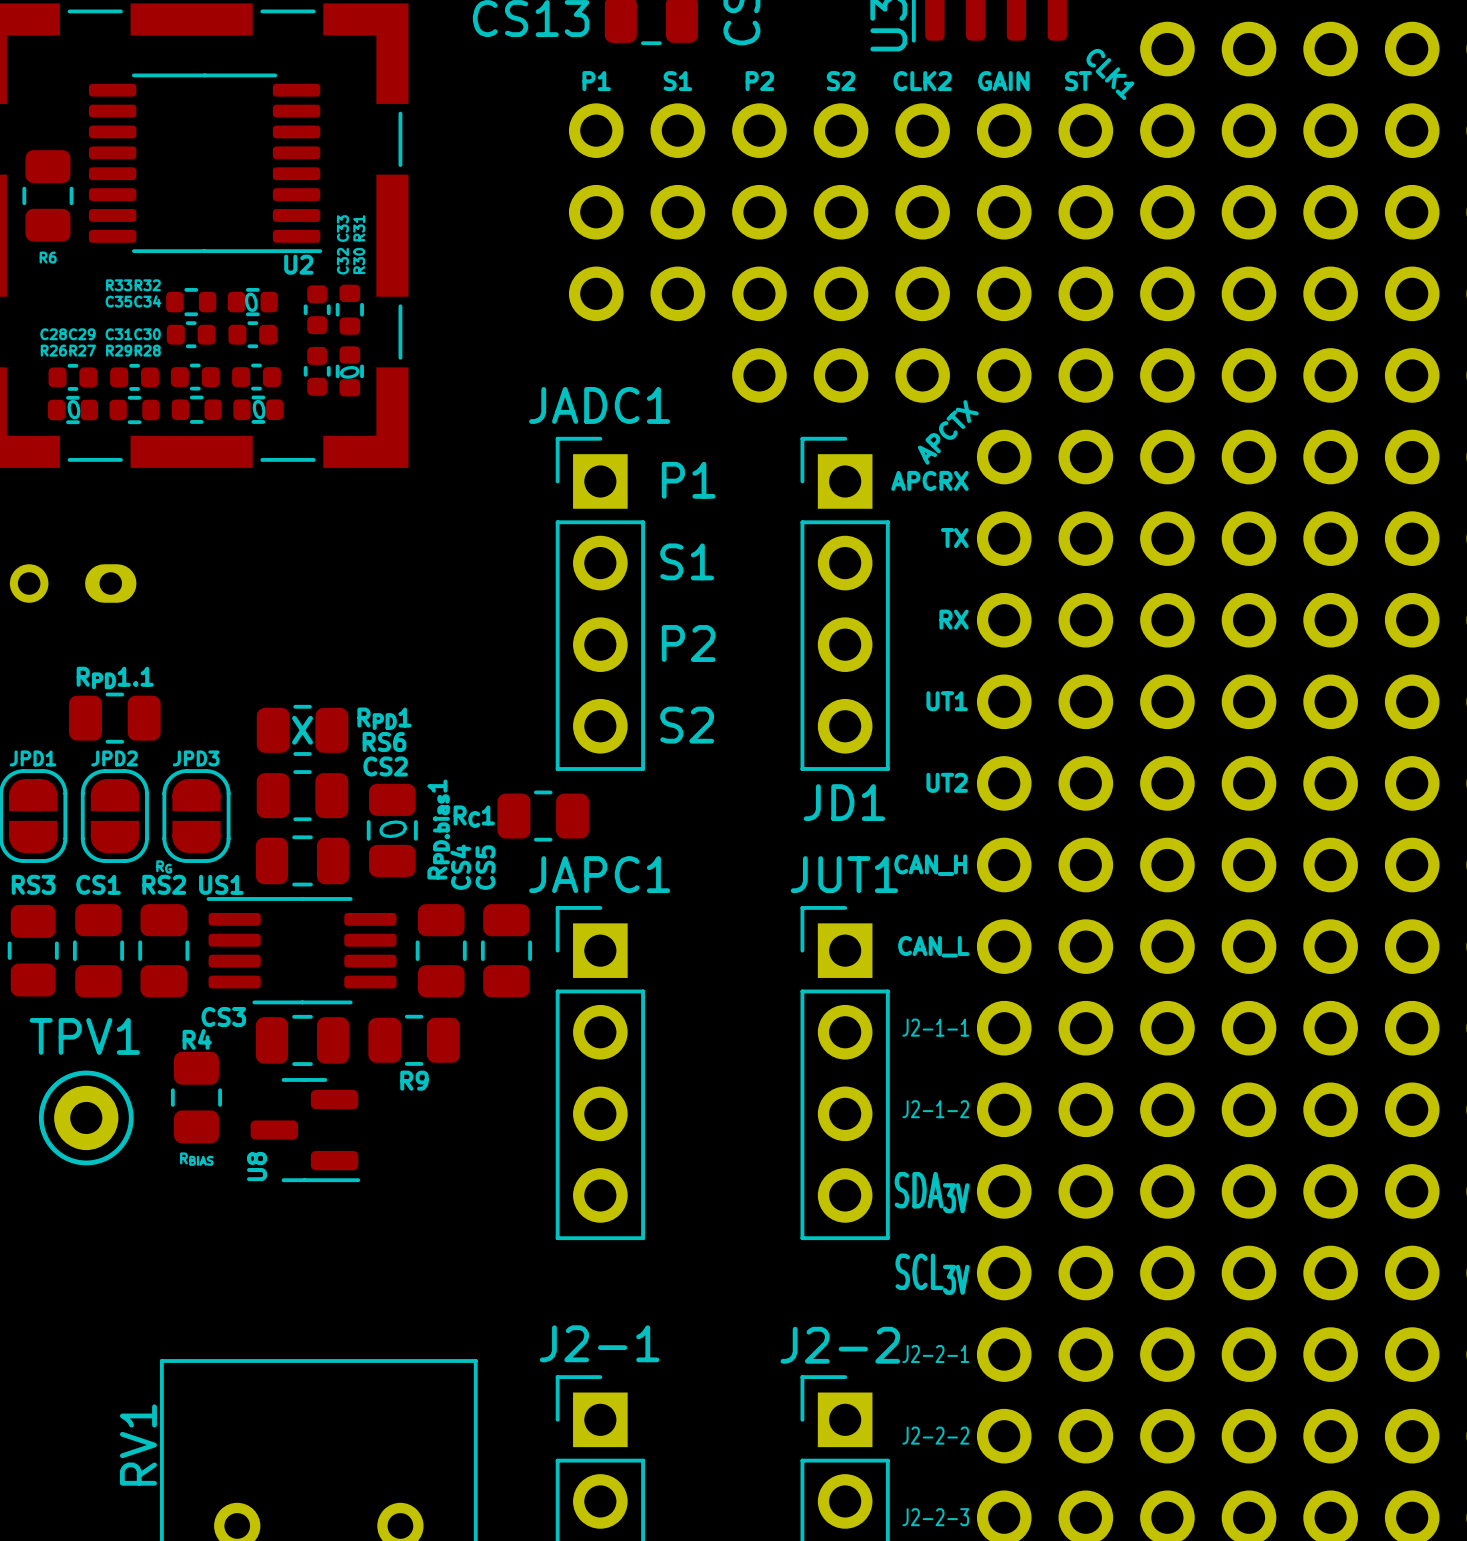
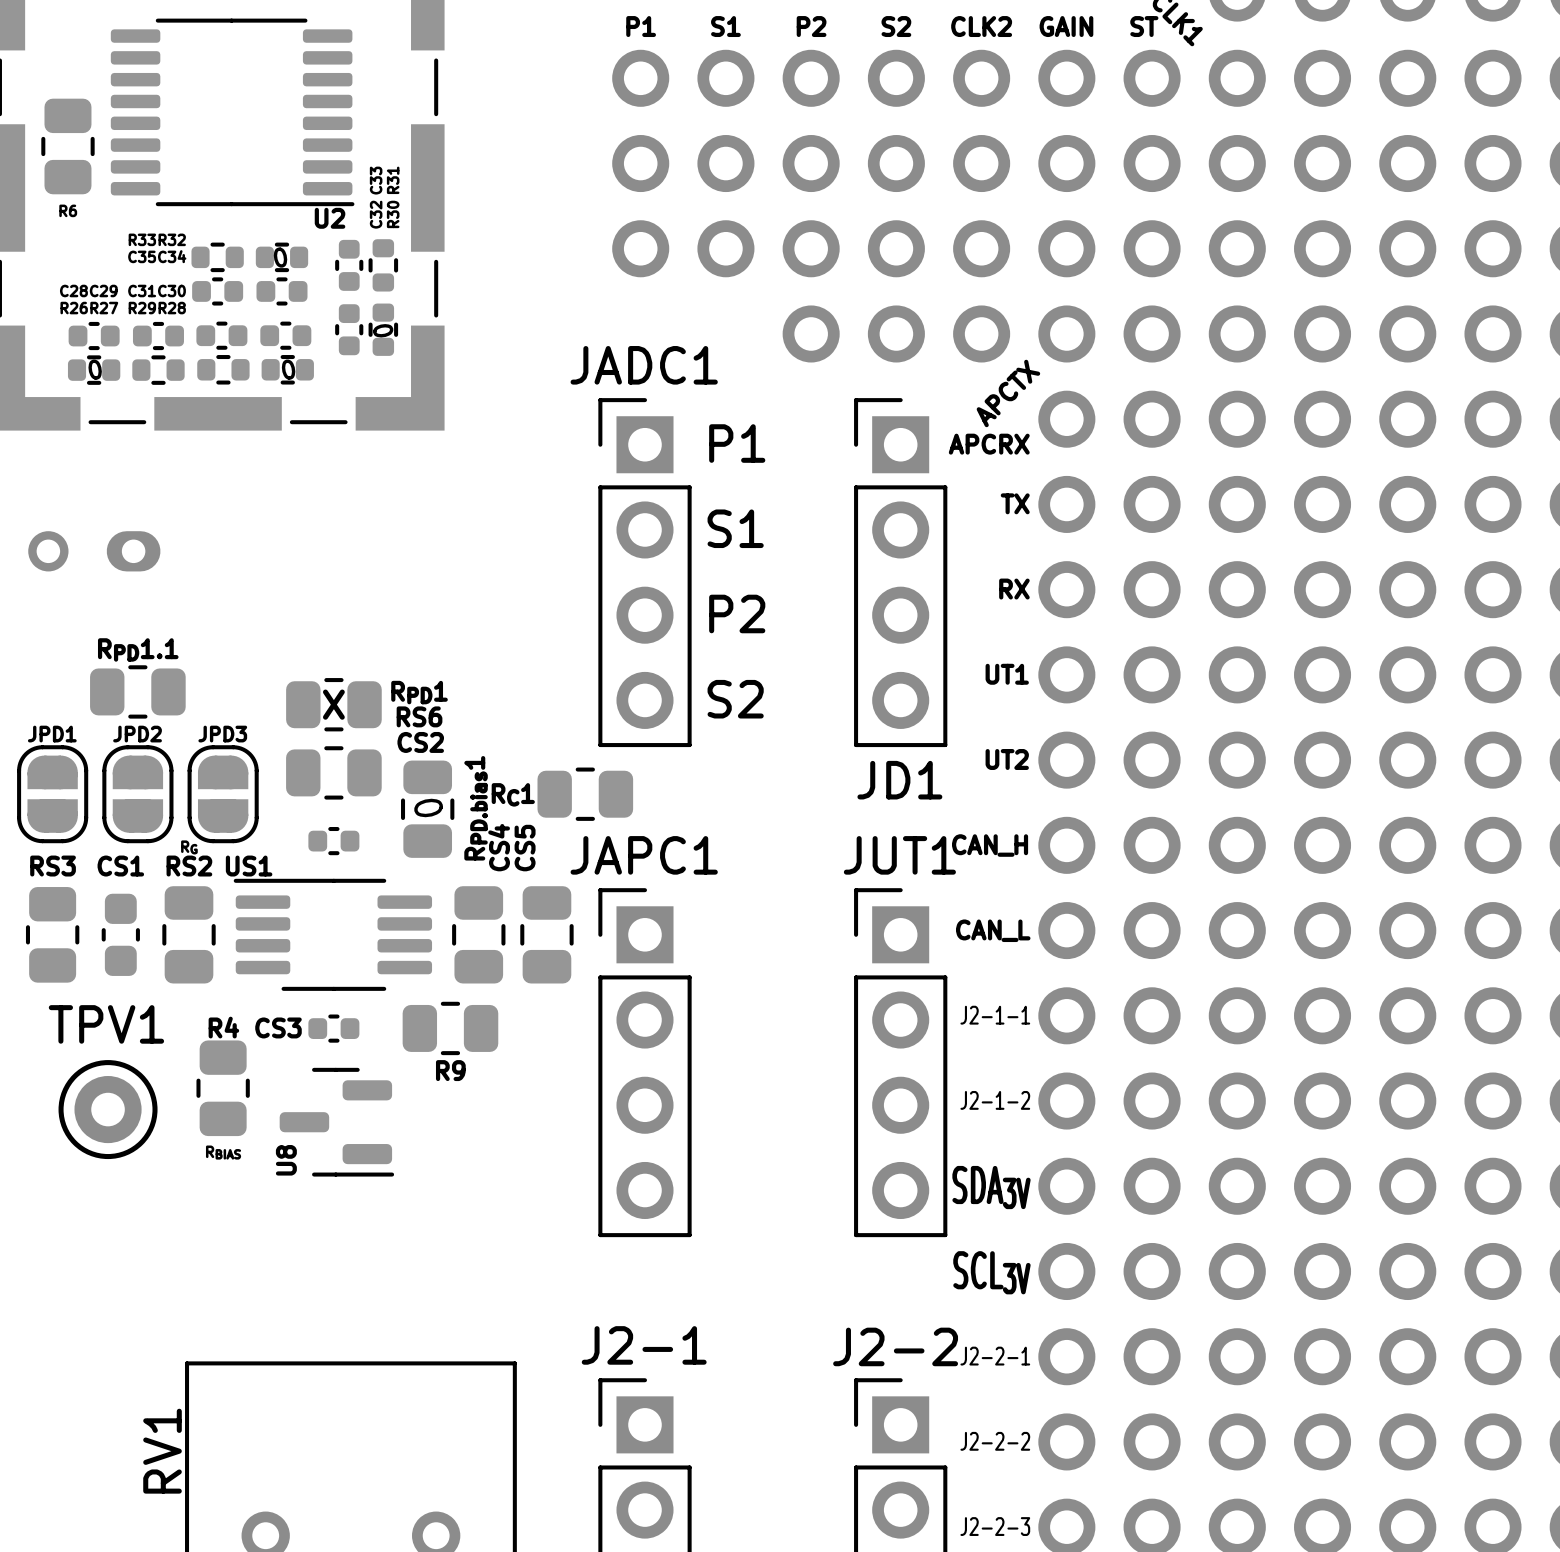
CS2 footprint: [255, 835, 350, 887] -> [308, 826, 360, 856]
CS1 footprint: [72, 904, 125, 998] -> [101, 893, 140, 976]
CS3 footprint: [255, 1014, 350, 1066] -> [308, 1014, 360, 1043]
CS3 name position: CS3 (223, 1017) -> CS3 (278, 1027)

